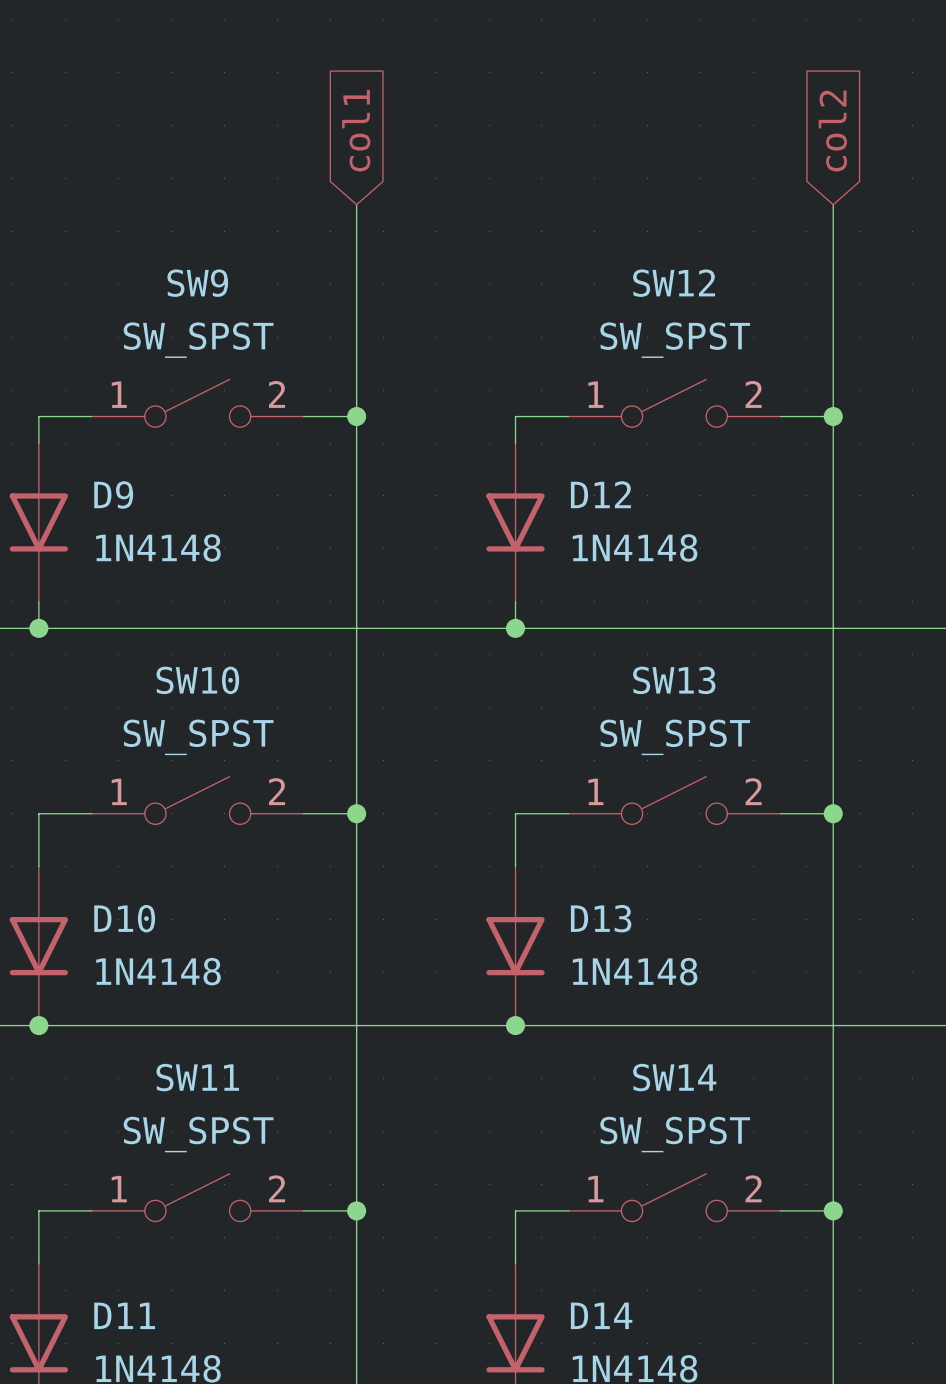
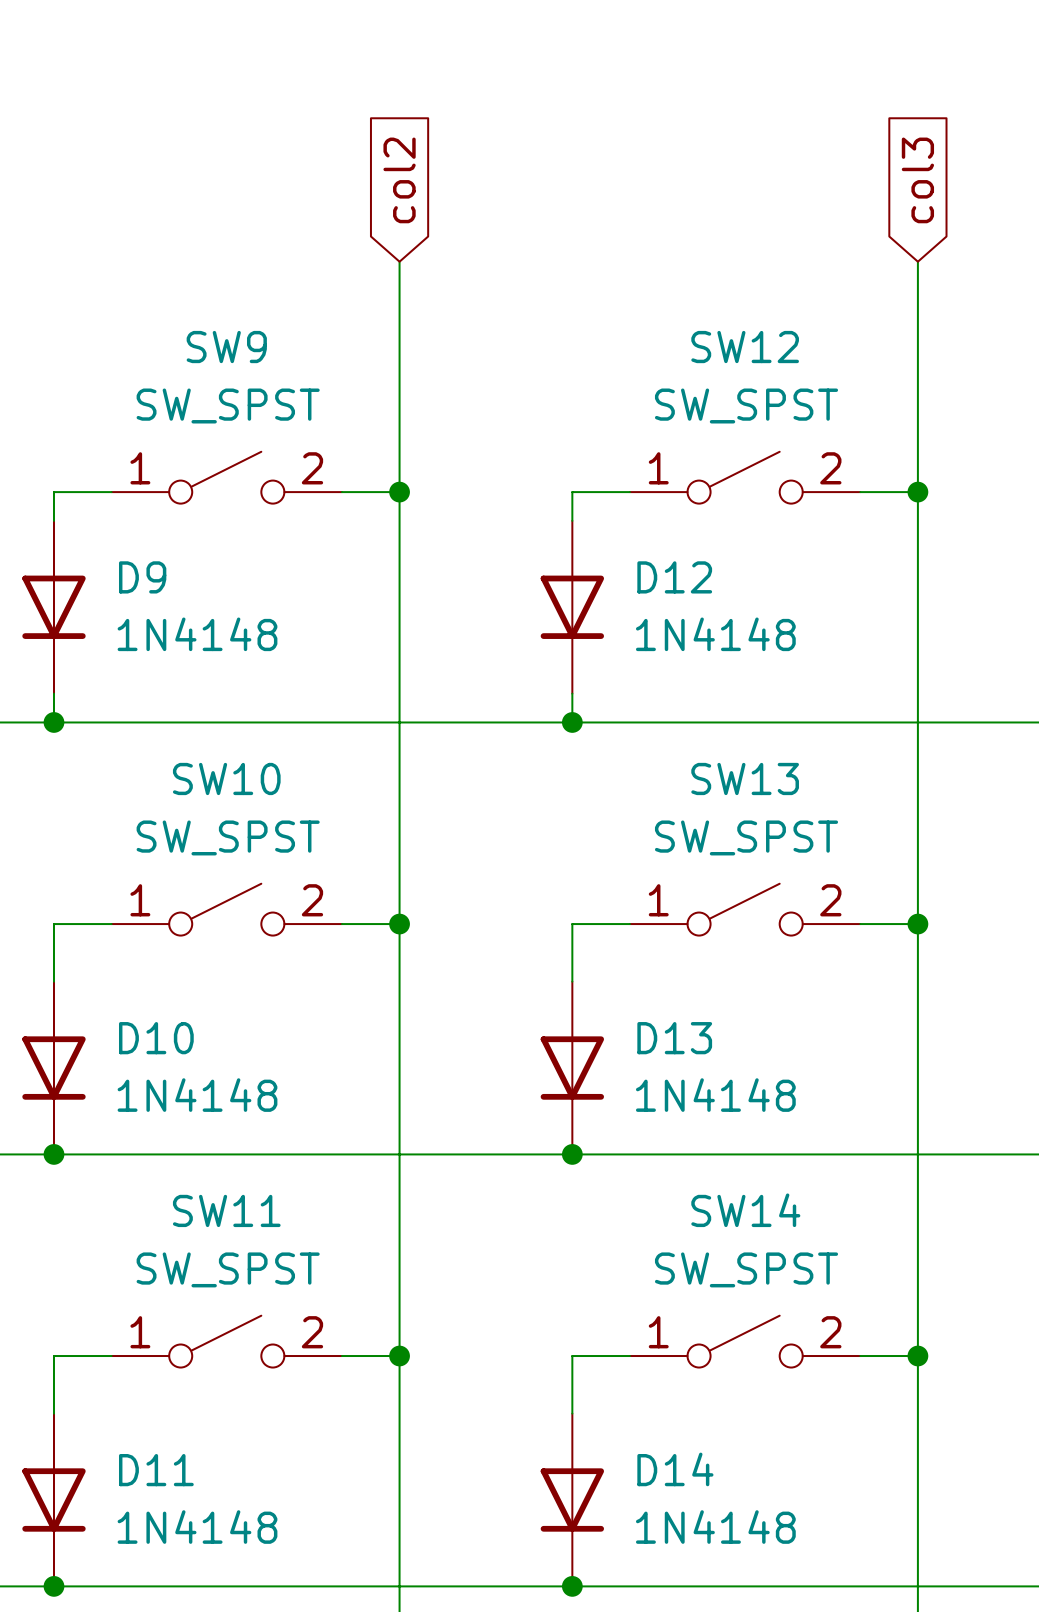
global label: col1 (356, 130) -> col2 (399, 180)
global label: col2 (832, 130) -> col3 (917, 180)

